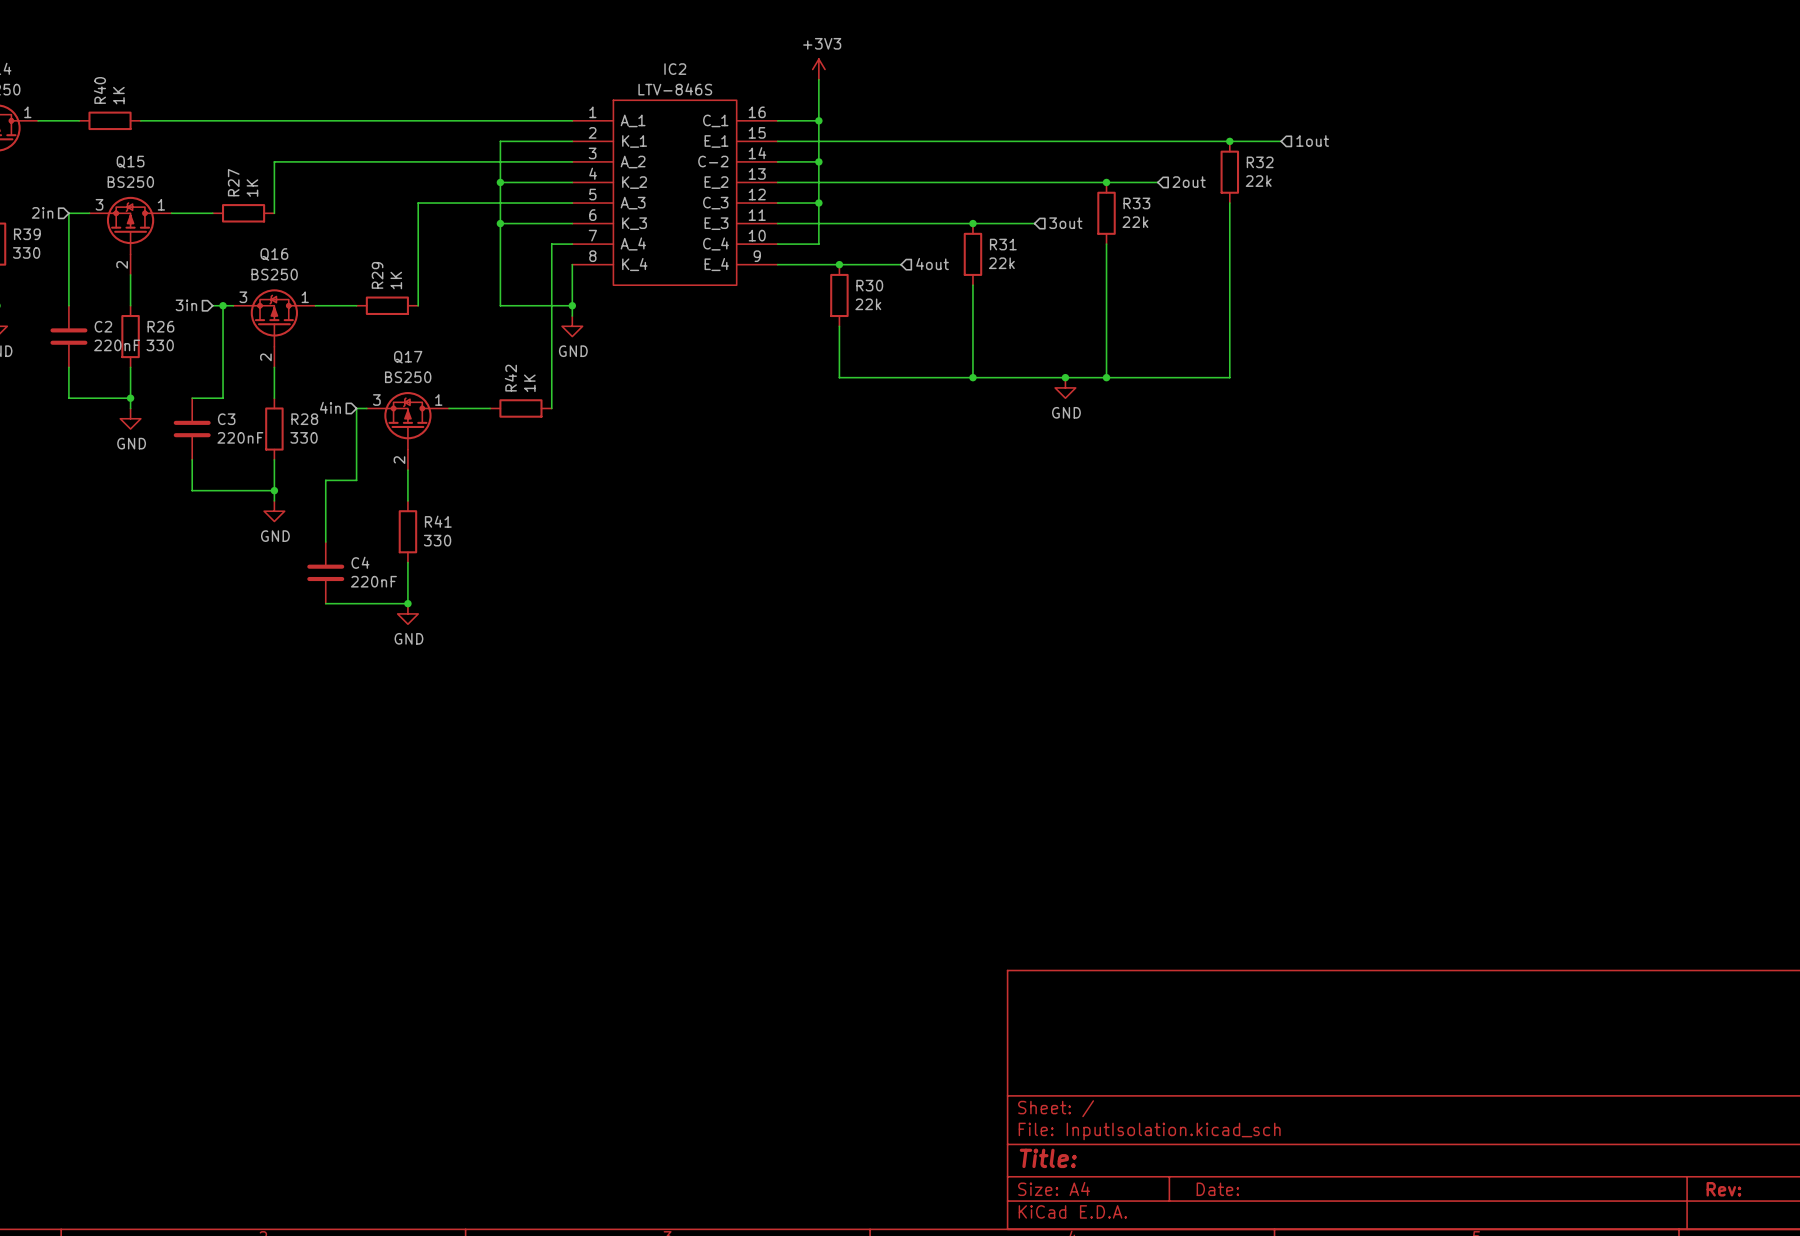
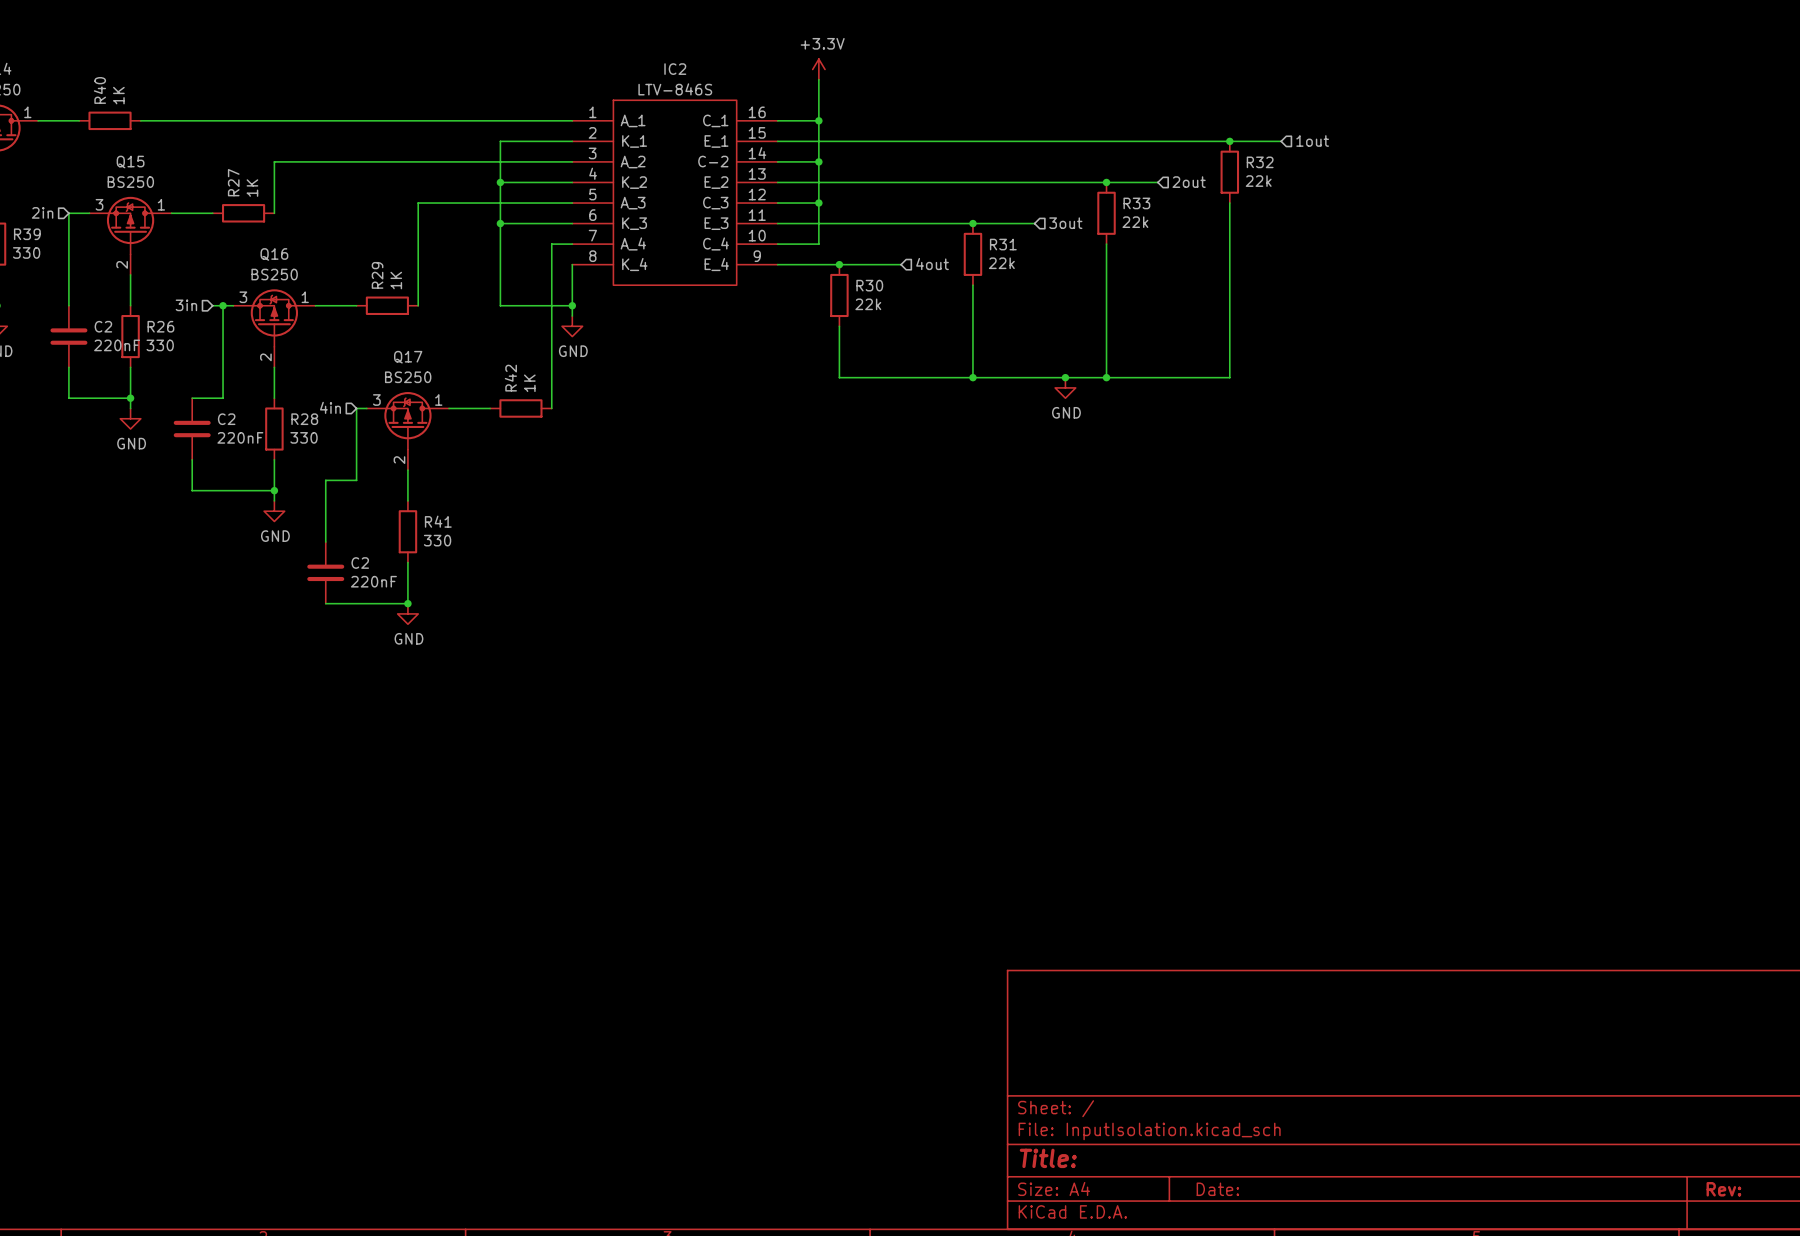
power symbol: +3V3 (818, 69) -> +3.3V (818, 69)
C3 name: C3 (226, 419) -> C2 (226, 419)
C4 name: C4 (360, 562) -> C2 (360, 563)

